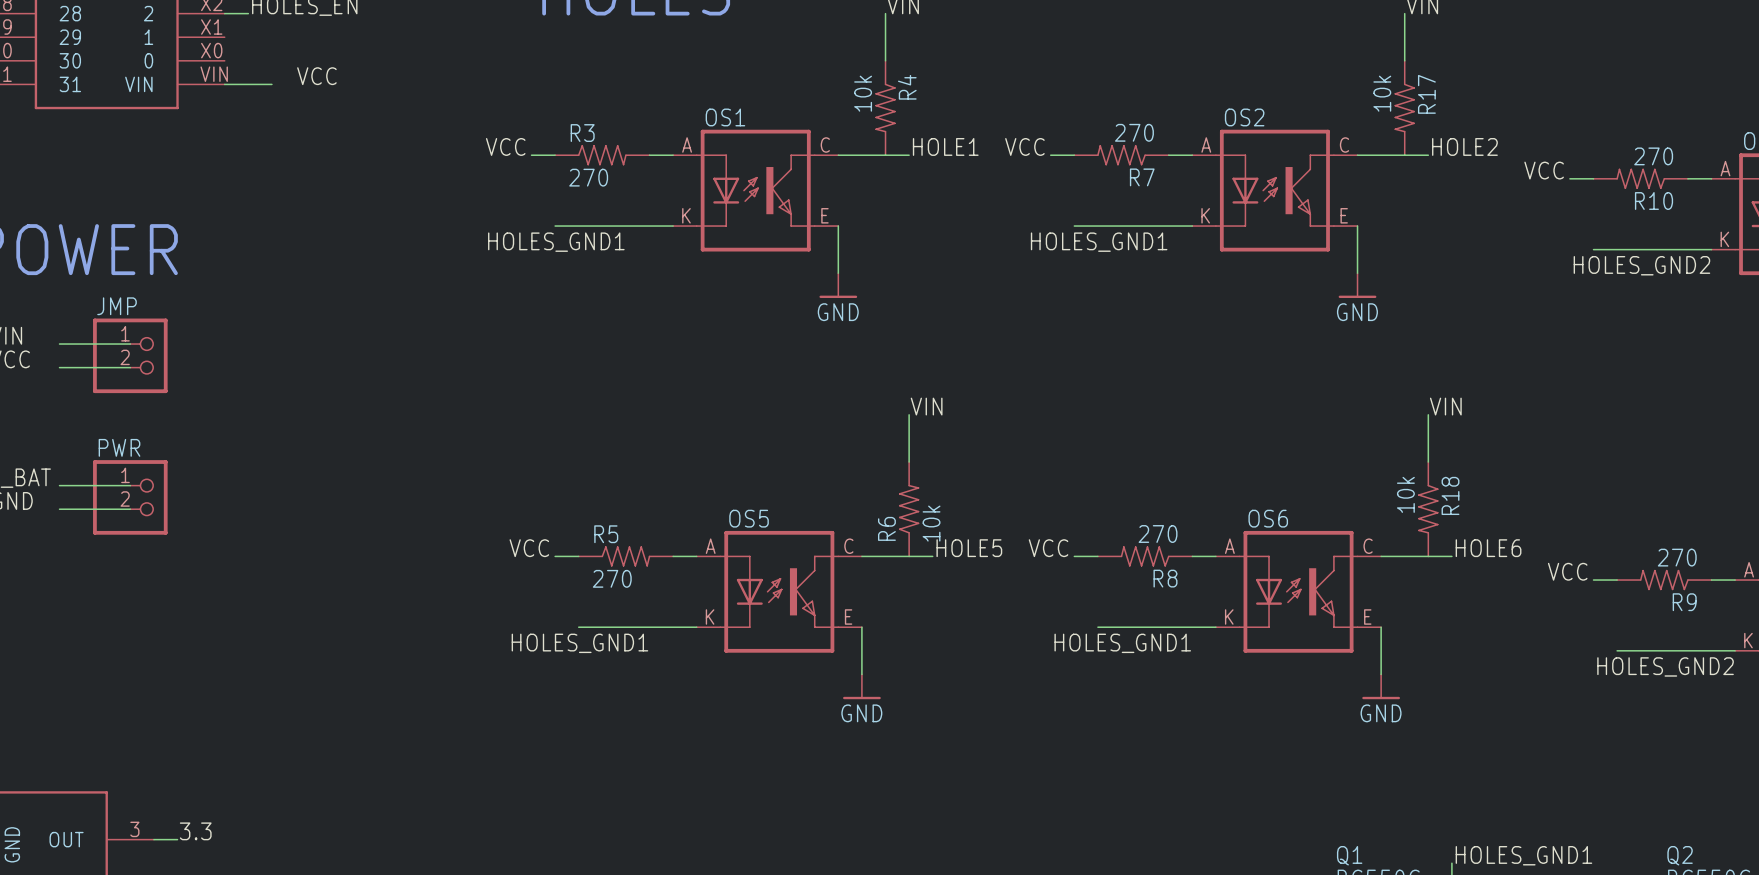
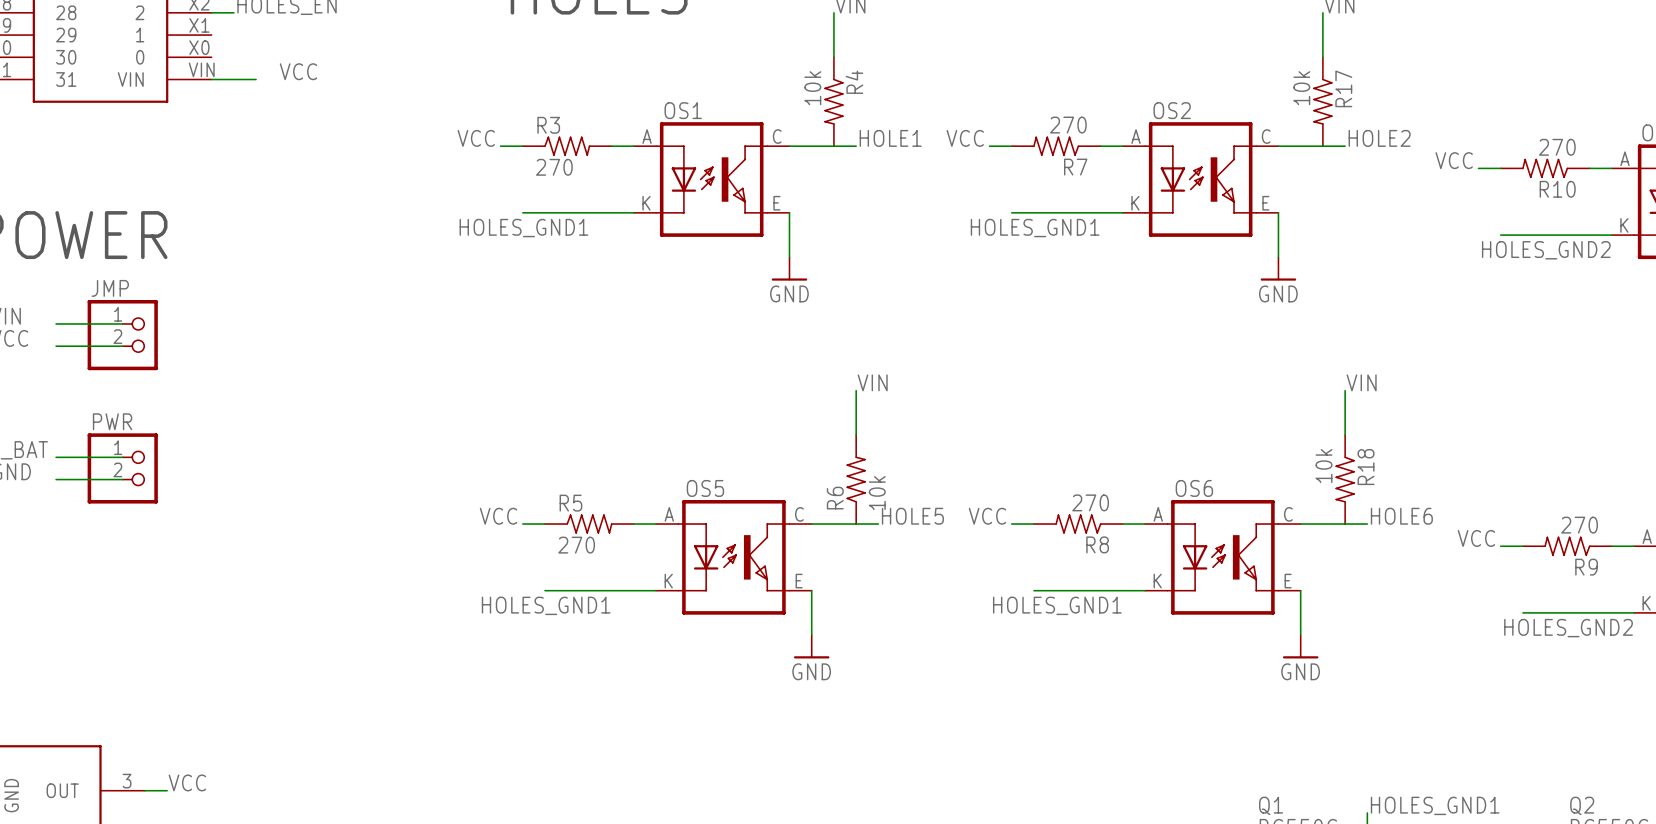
label: 3.3 (195, 831) -> VCC (187, 782)

